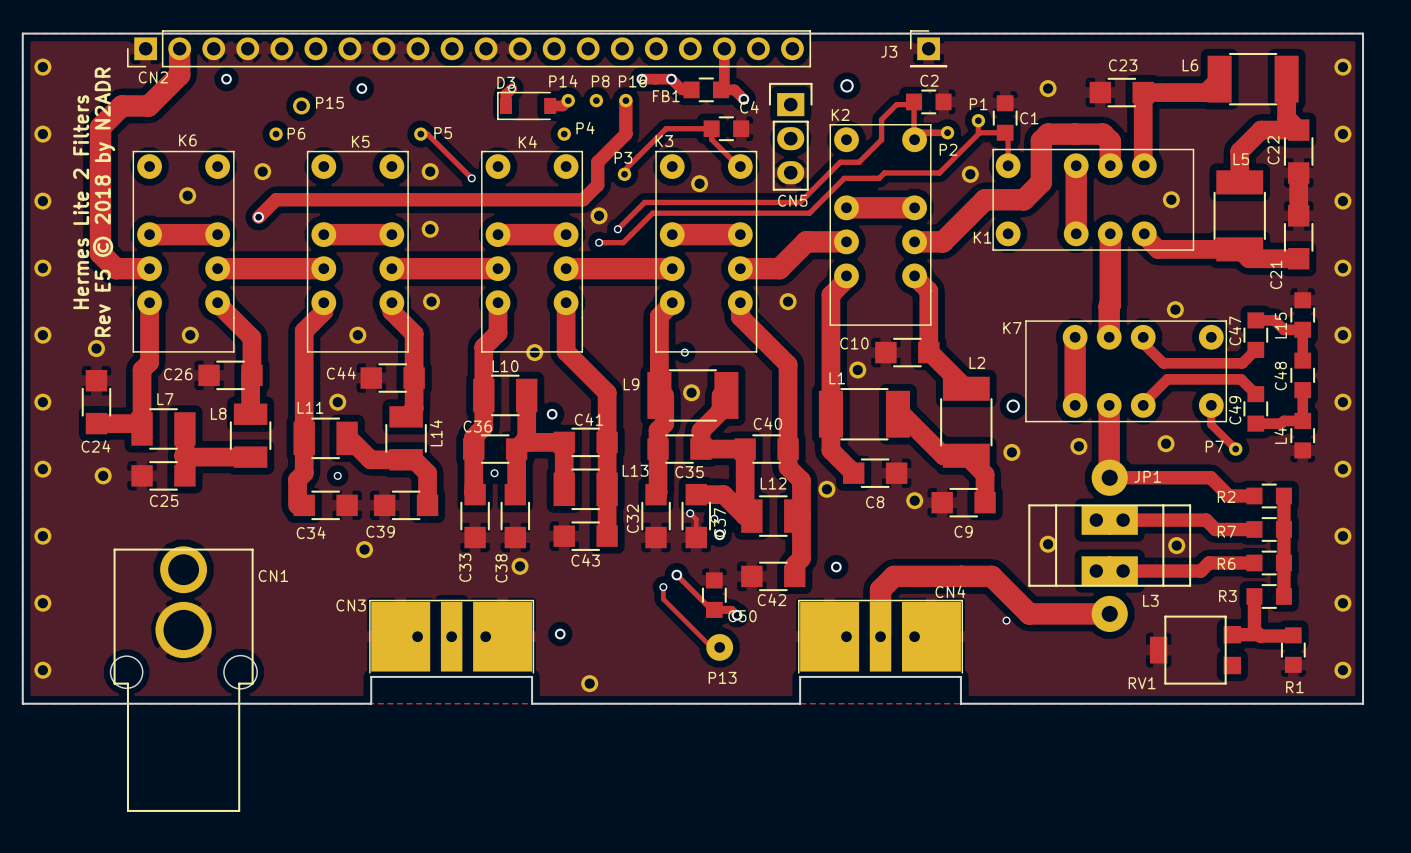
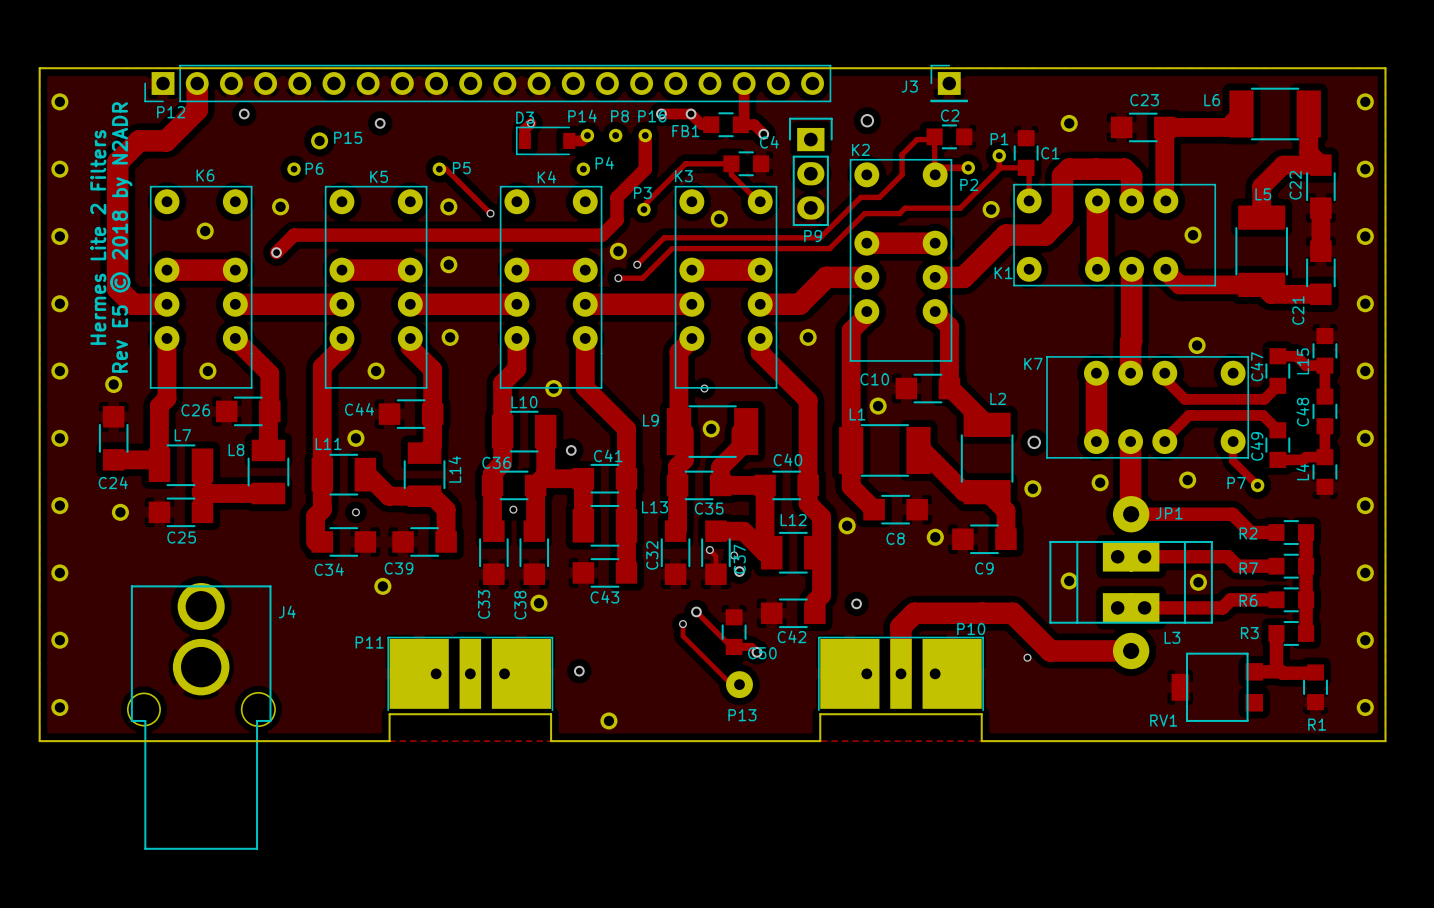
CN2 name: CN2 (153, 77) -> P12 (171, 112)
CN5 name: CN5 (792, 200) -> P9 (813, 236)
CN1 name: CN1 (273, 576) -> J4 (287, 611)
CN4 name: CN4 (950, 591) -> P10 (971, 629)
CN3 name: CN3 (351, 605) -> P11 (369, 642)

